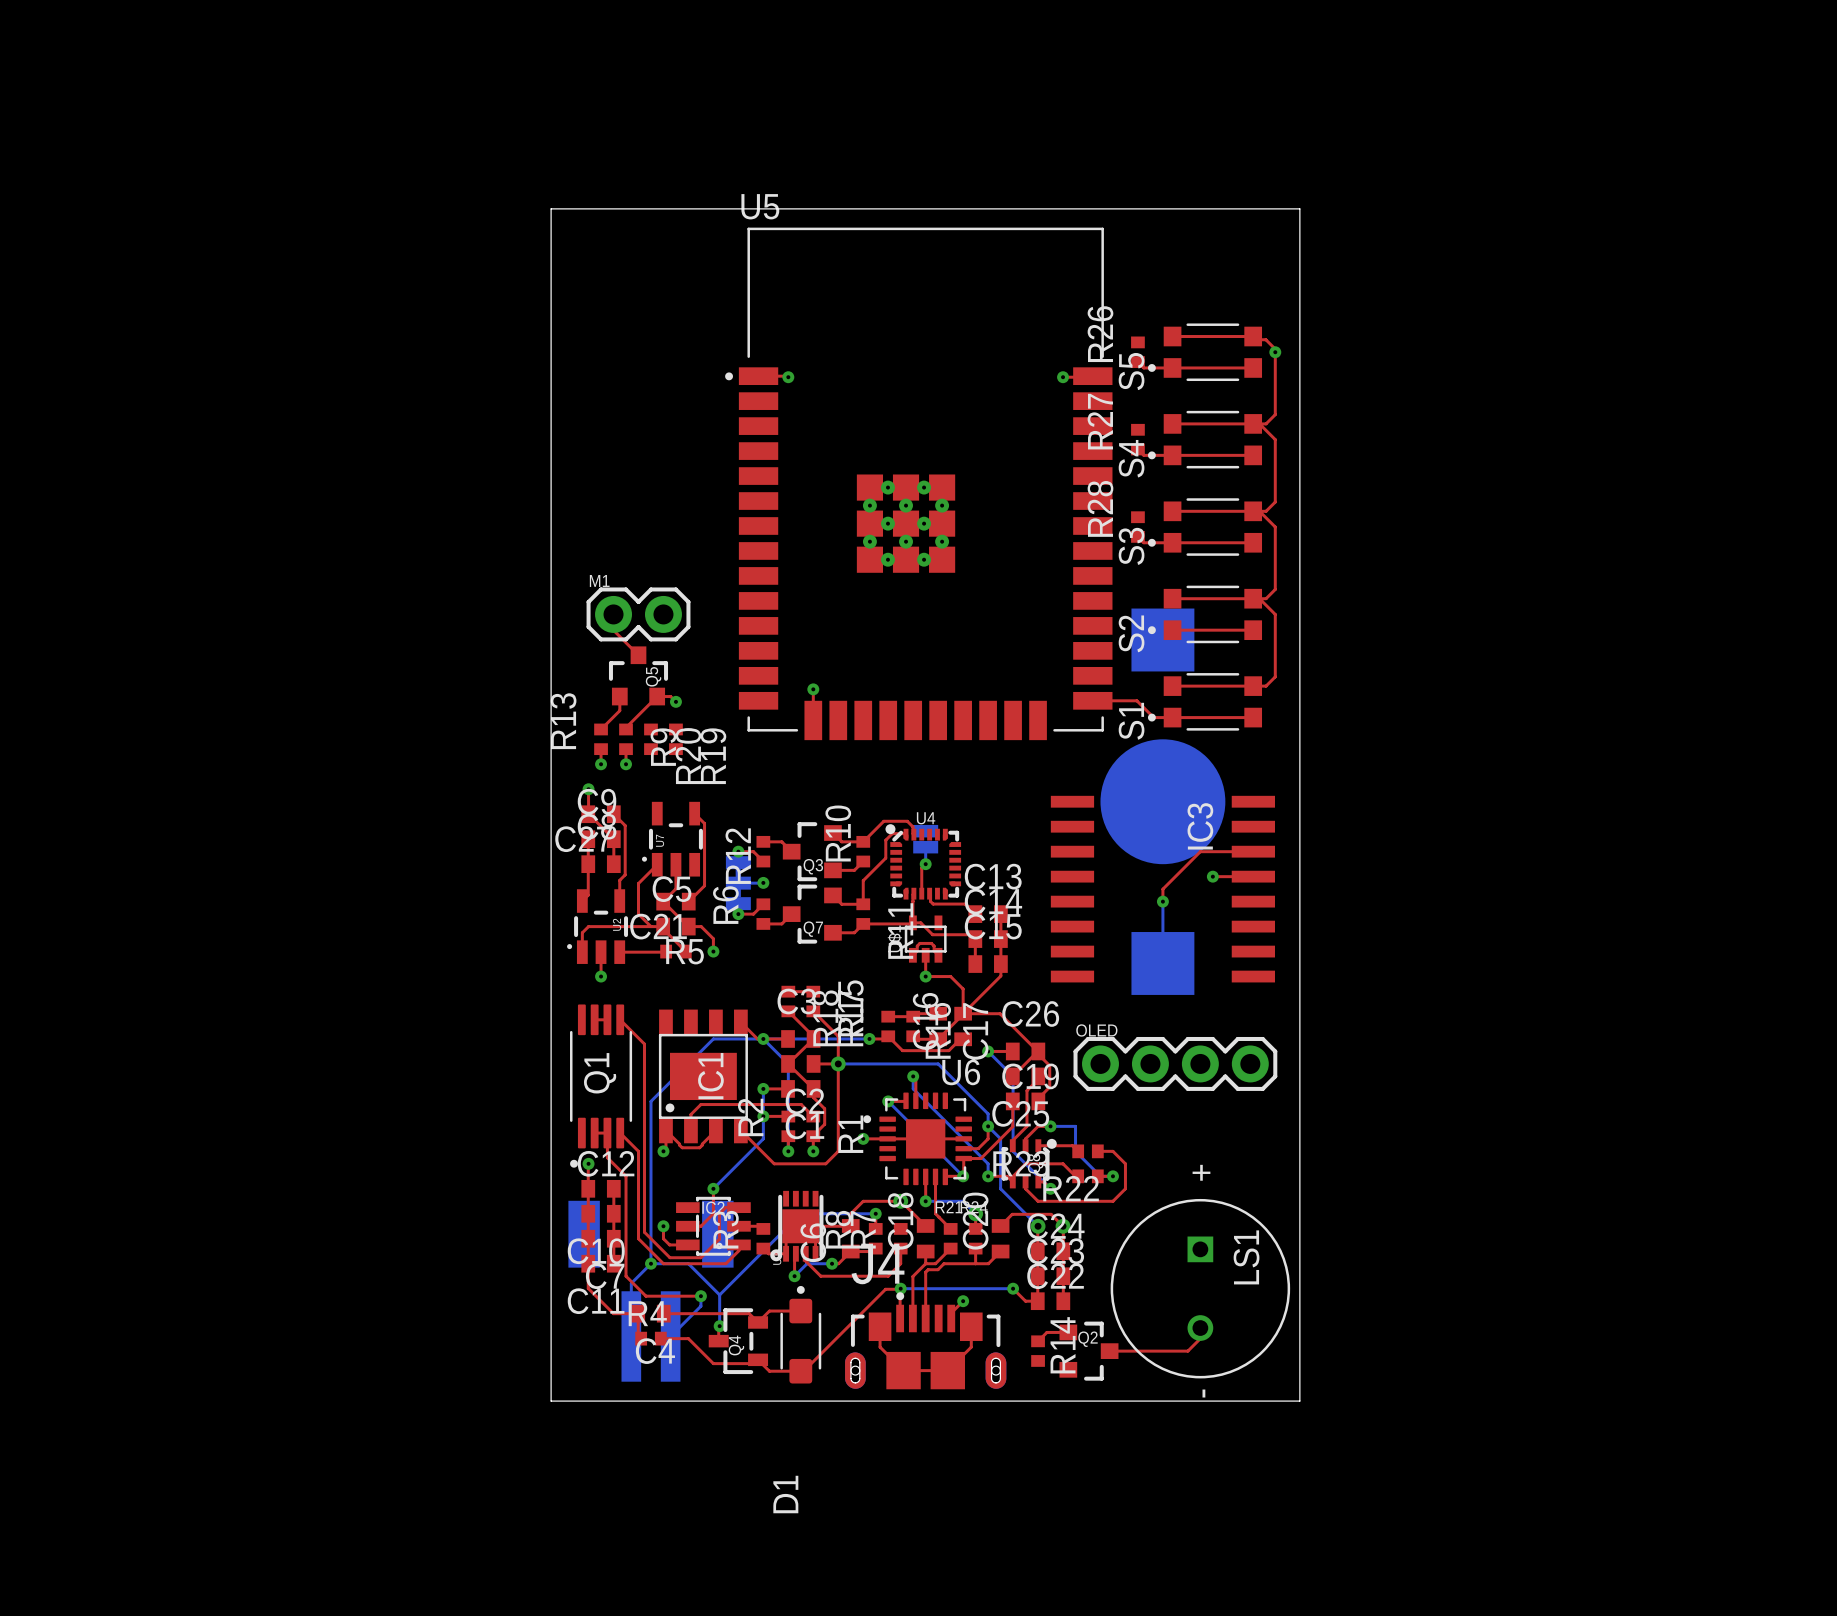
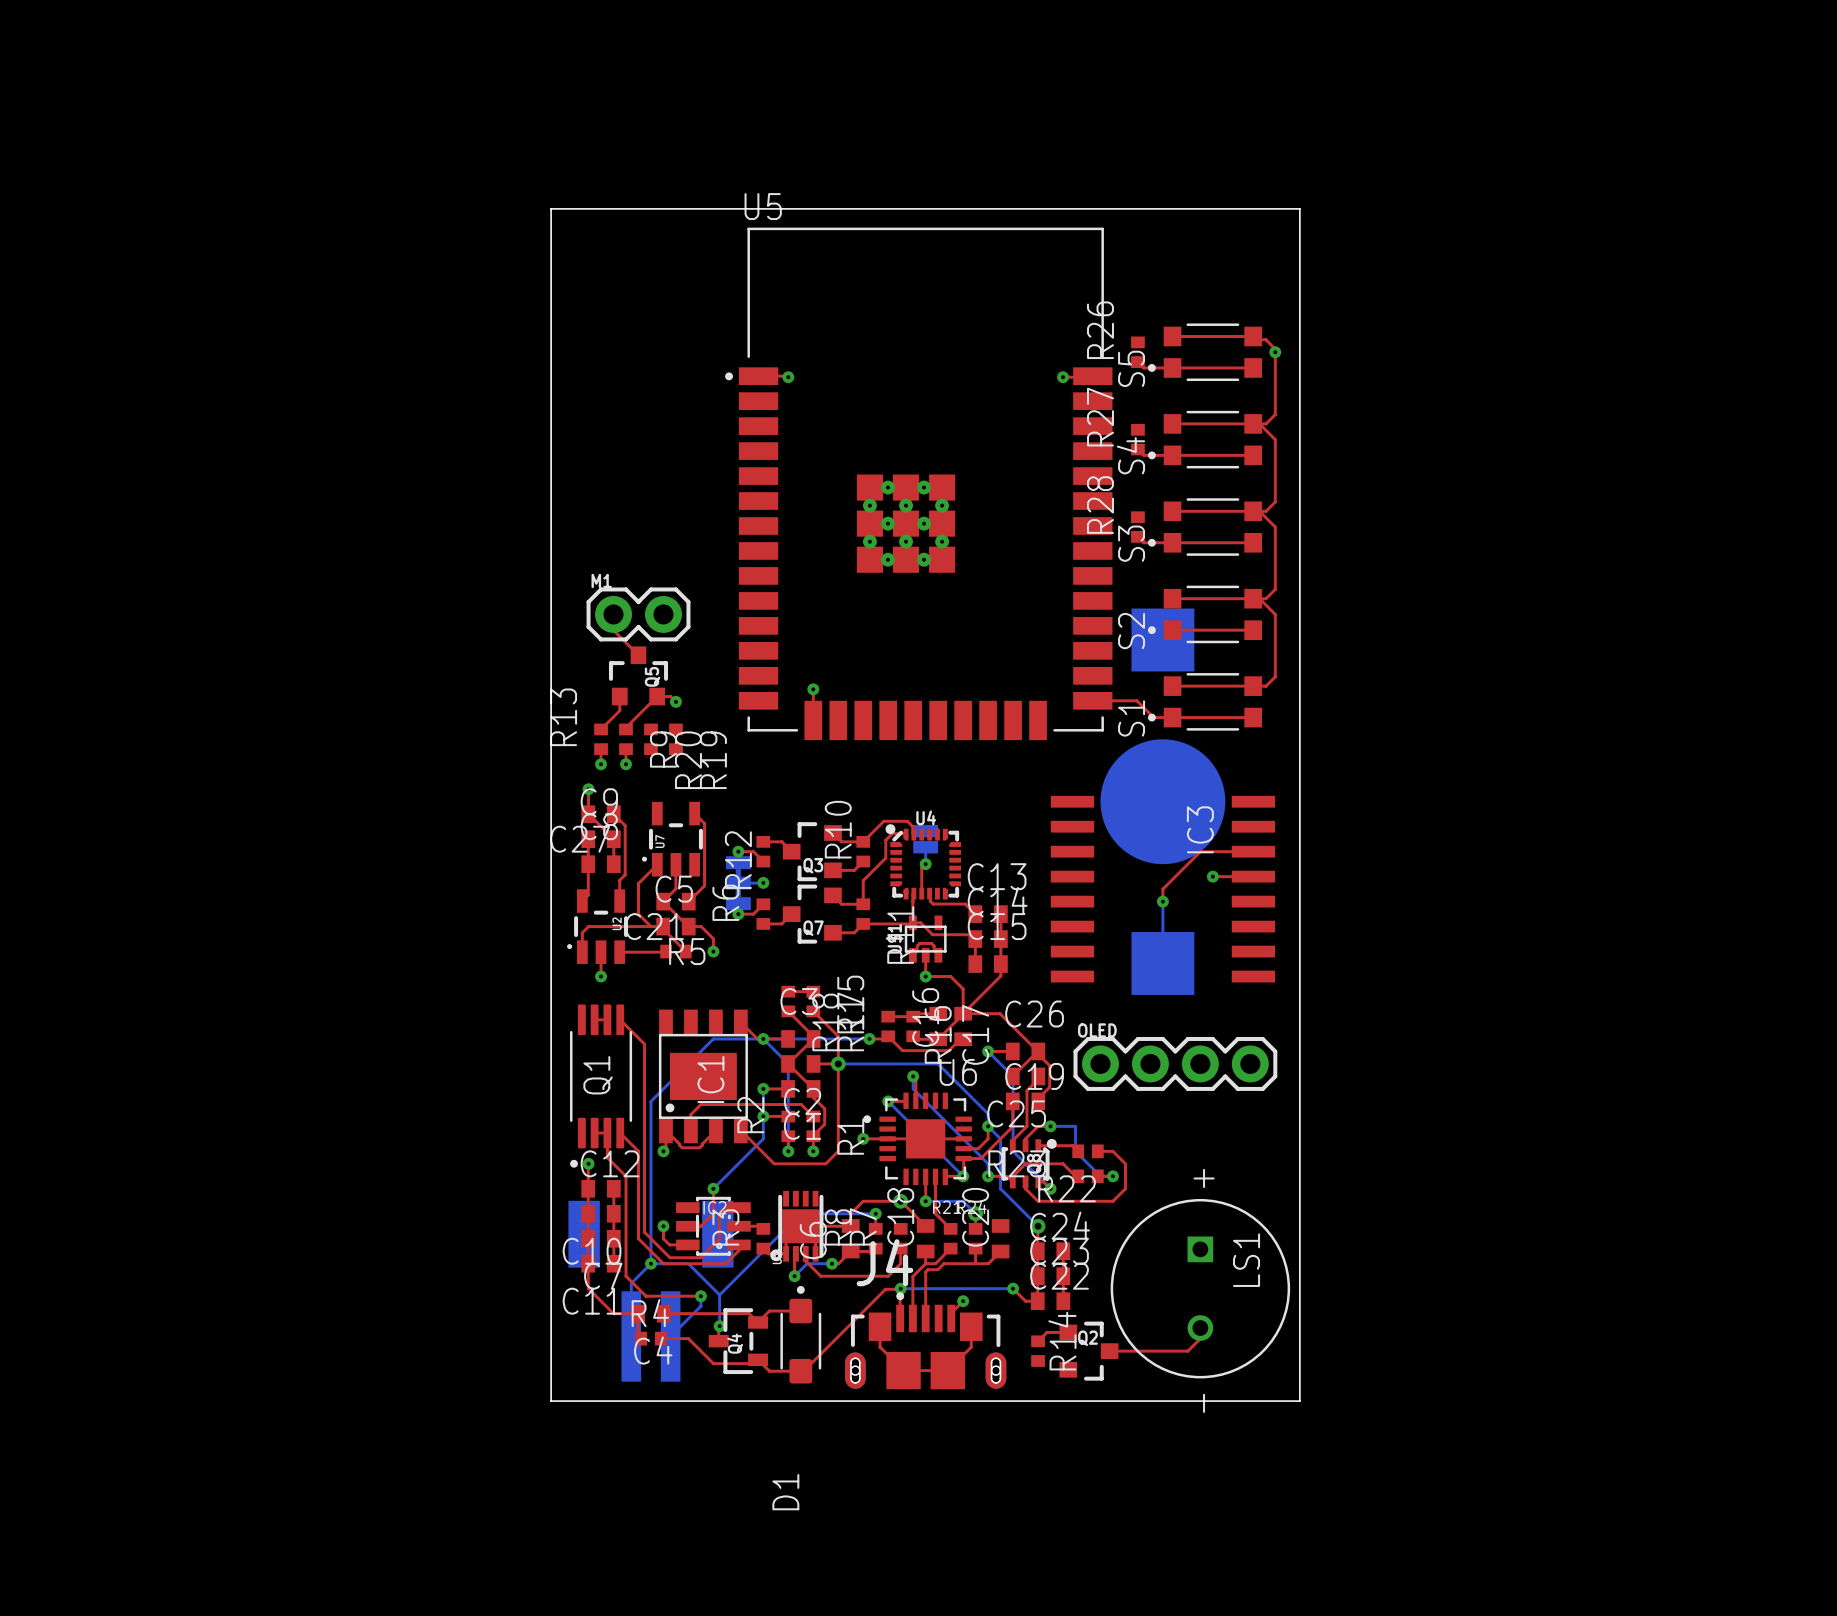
top track: (1000, 1225) (1012, 1214) (1051, 1214) (1063, 1226) (1063, 1251) -> none
via: (1063, 1226) -> none

